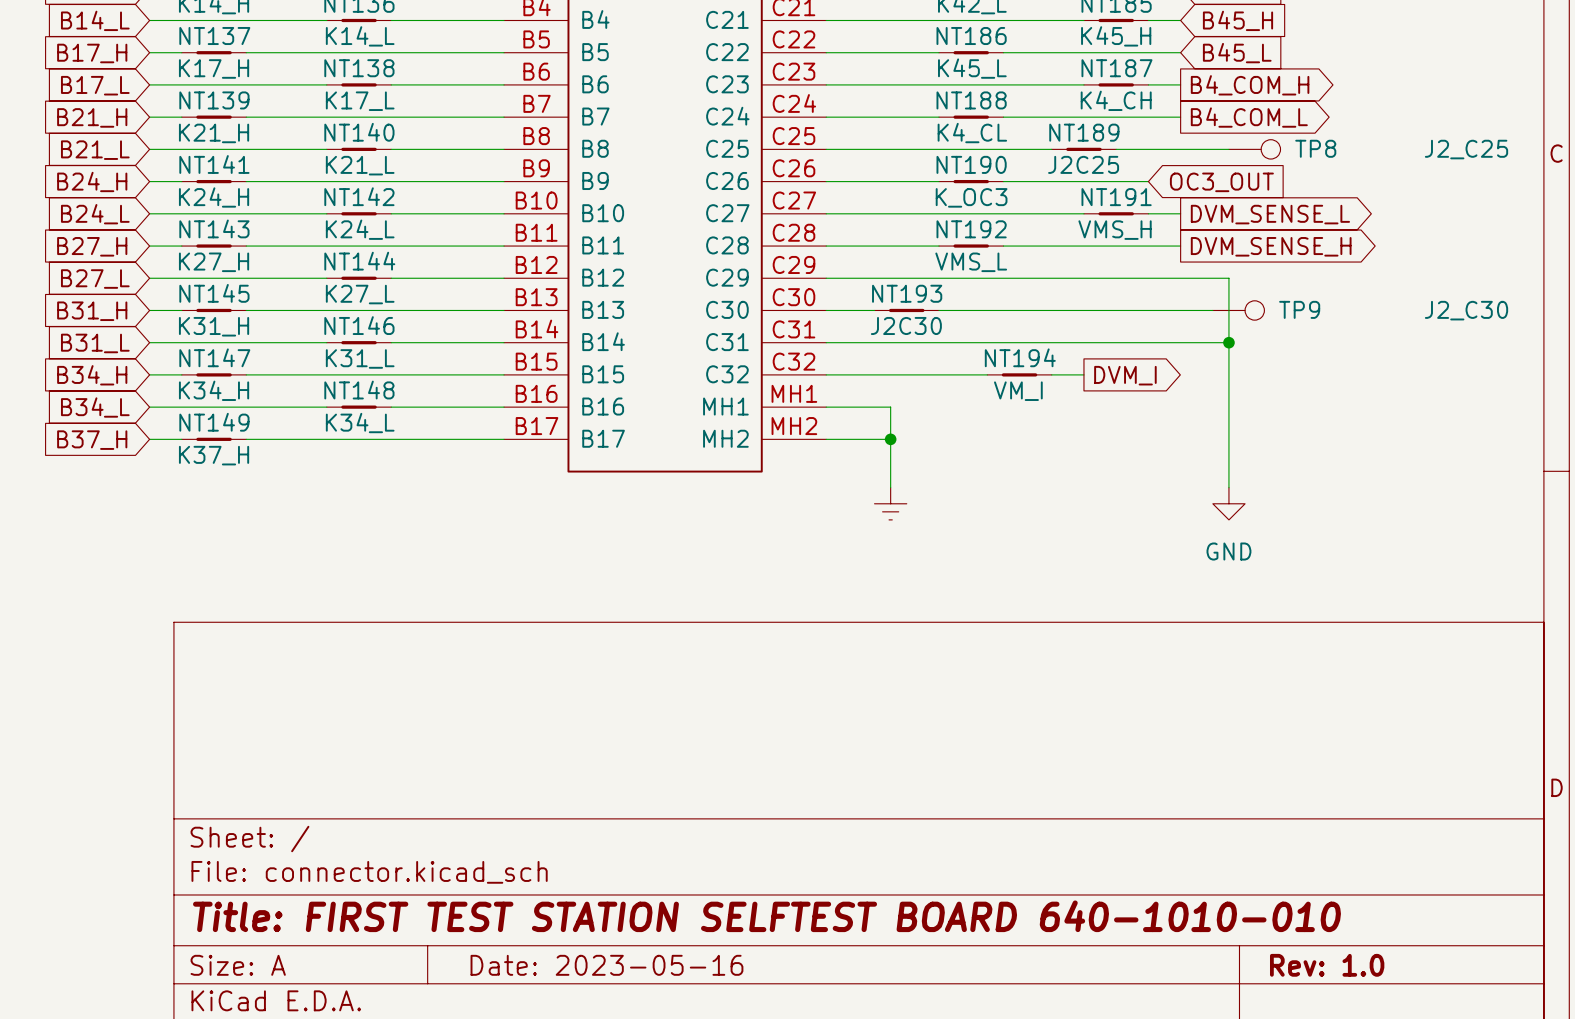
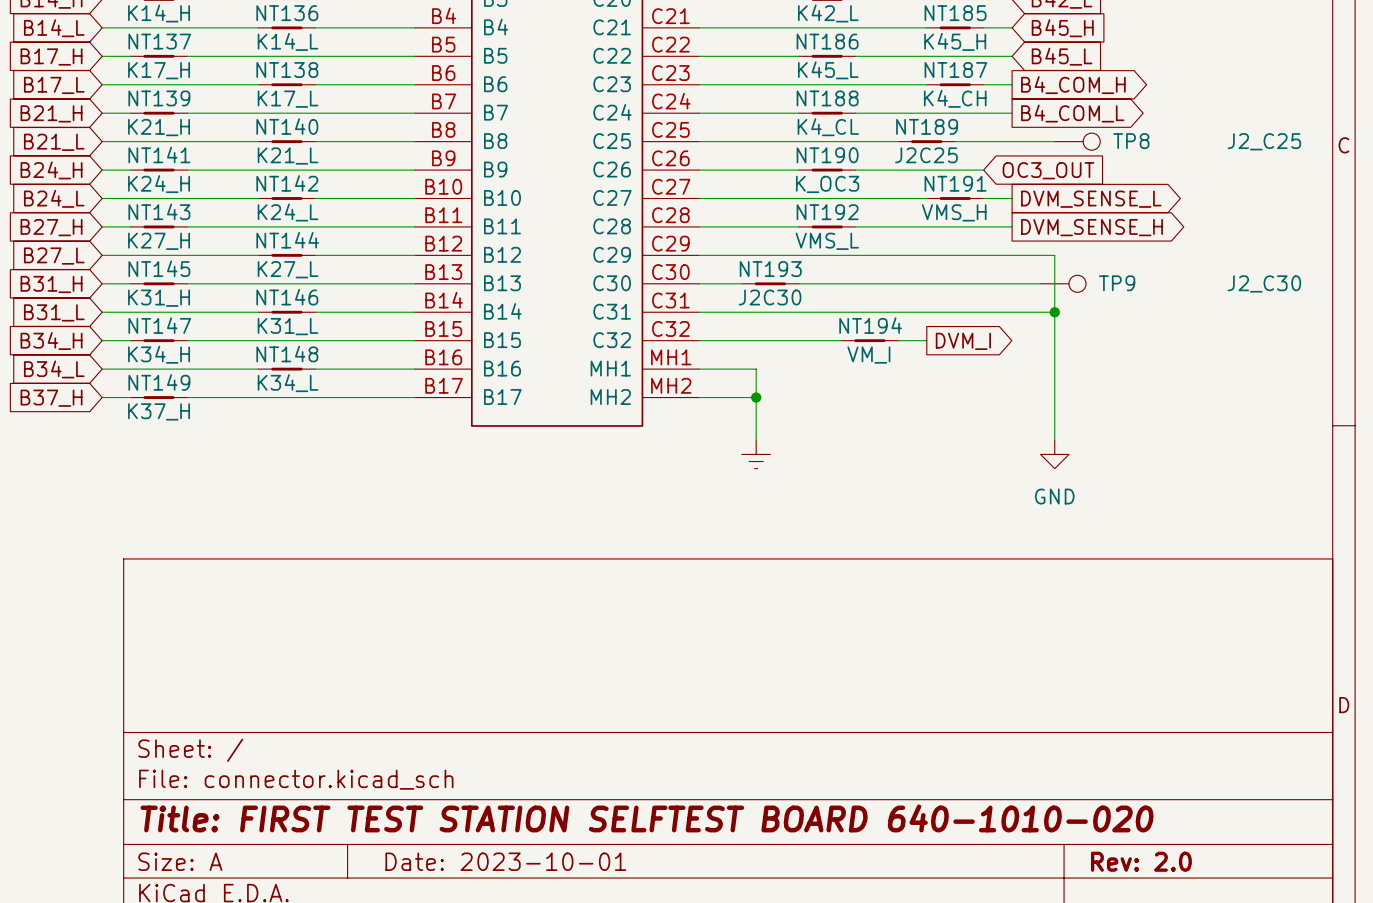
title block: Title: FIRST TEST STATION SELFTEST BOARD 640-1010-010 (766, 916) -> Title: FIRST TEST STATION SELFTEST BOARD 640-1010-020 (647, 818)
title block: Date: 2023-05-16 (606, 965) -> Date: 2023-10-01 (505, 861)
title block: Rev: 1.0 (1327, 965) -> Rev: 2.0 (1141, 861)

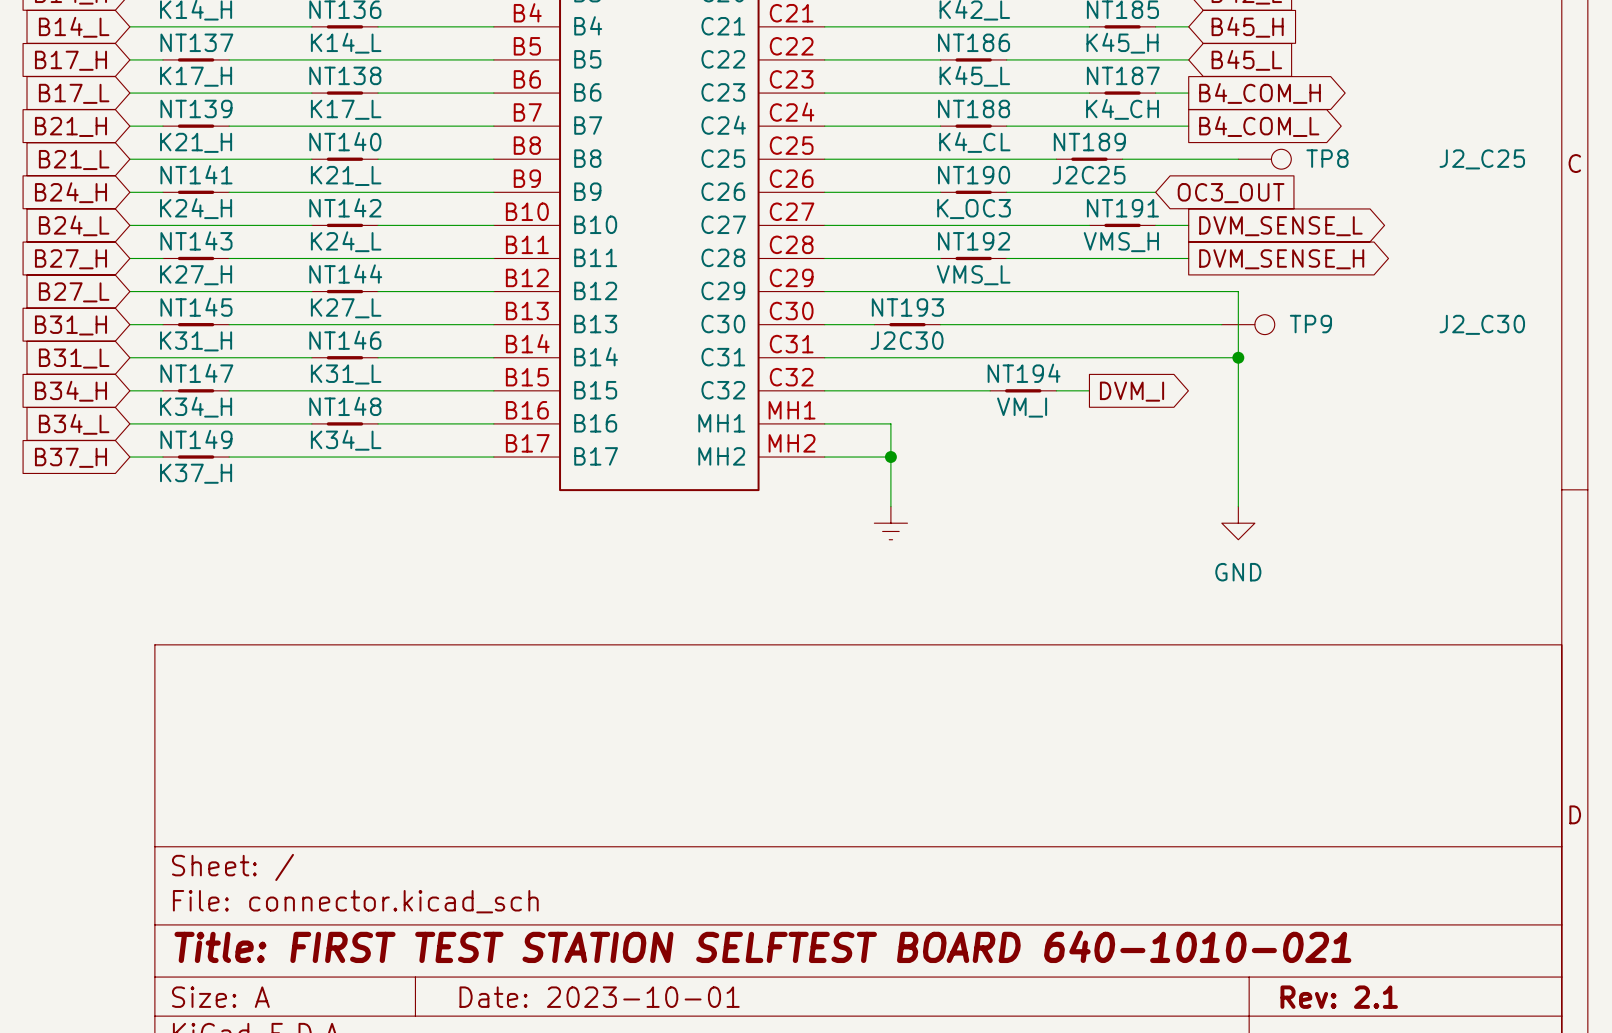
title block: Title: FIRST TEST STATION SELFTEST BOARD 640-1010-020 (647, 818) -> Title: FIRST TEST STATION SELFTEST BOARD 640-1010-021 (762, 946)
title block: Rev: 2.0 (1141, 861) -> Rev: 2.1 (1339, 997)

